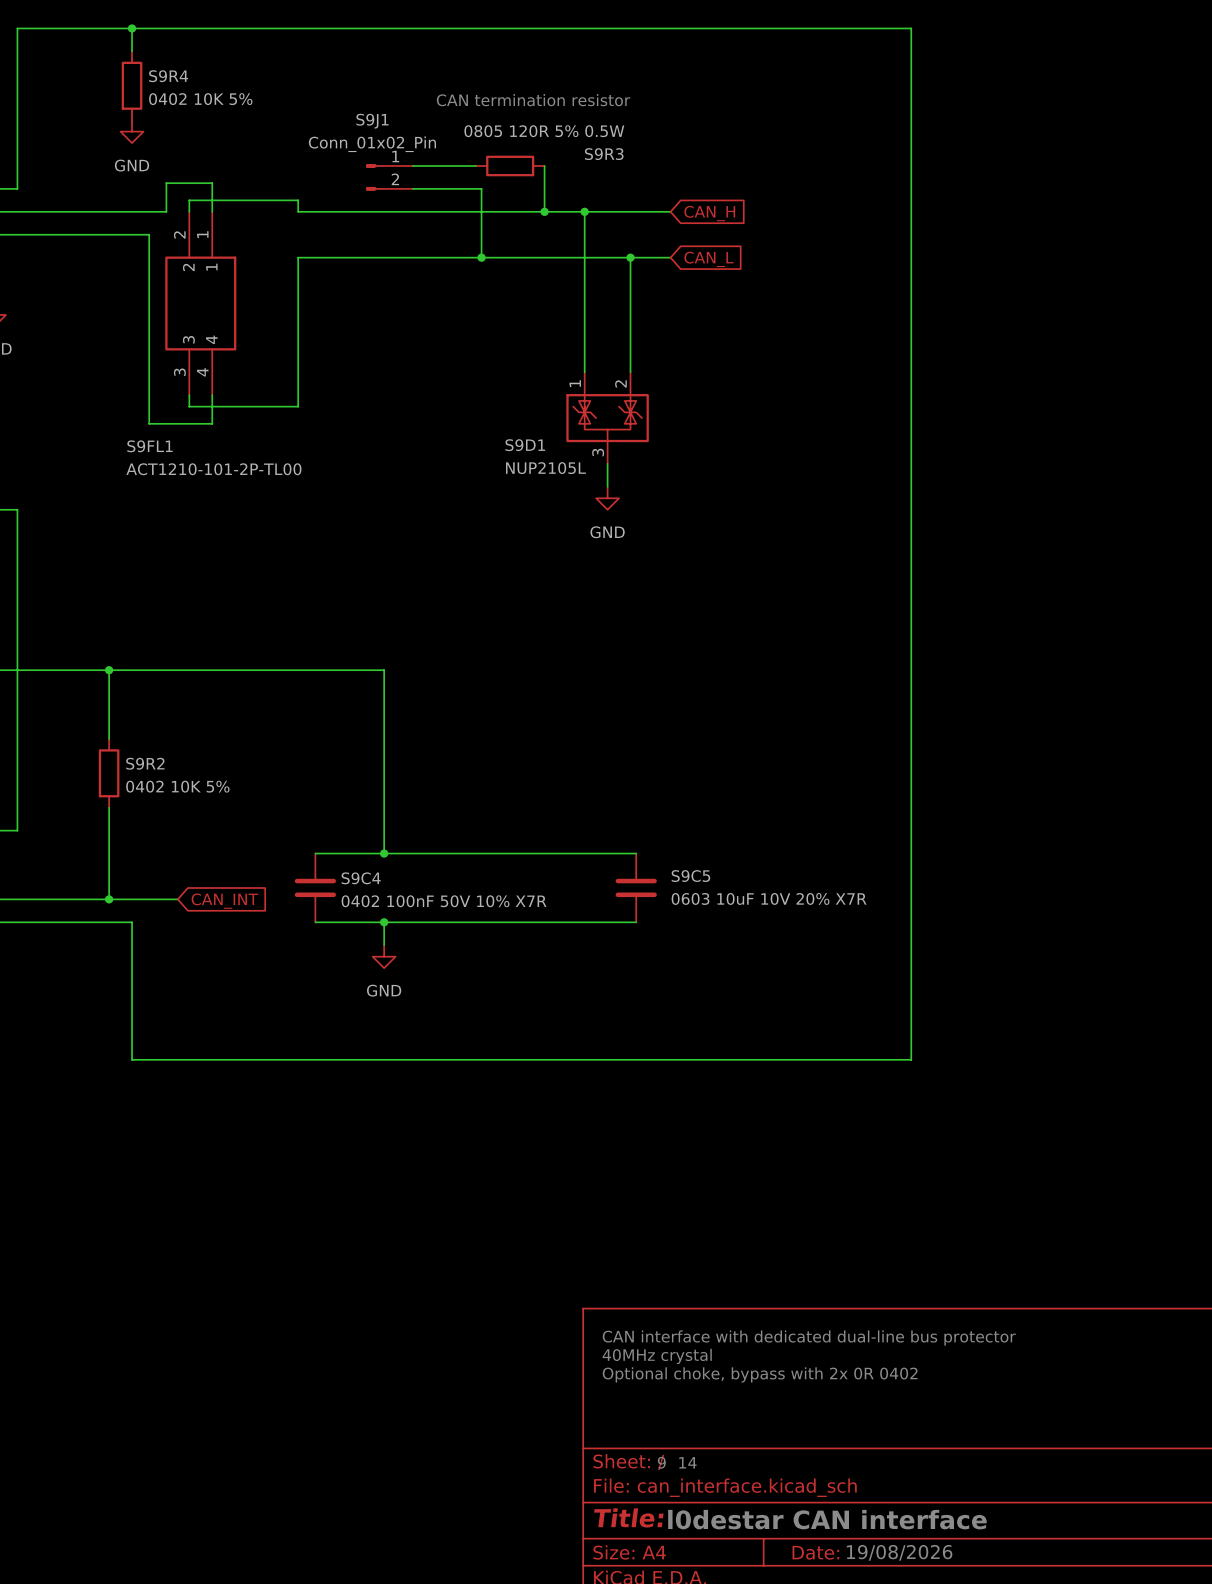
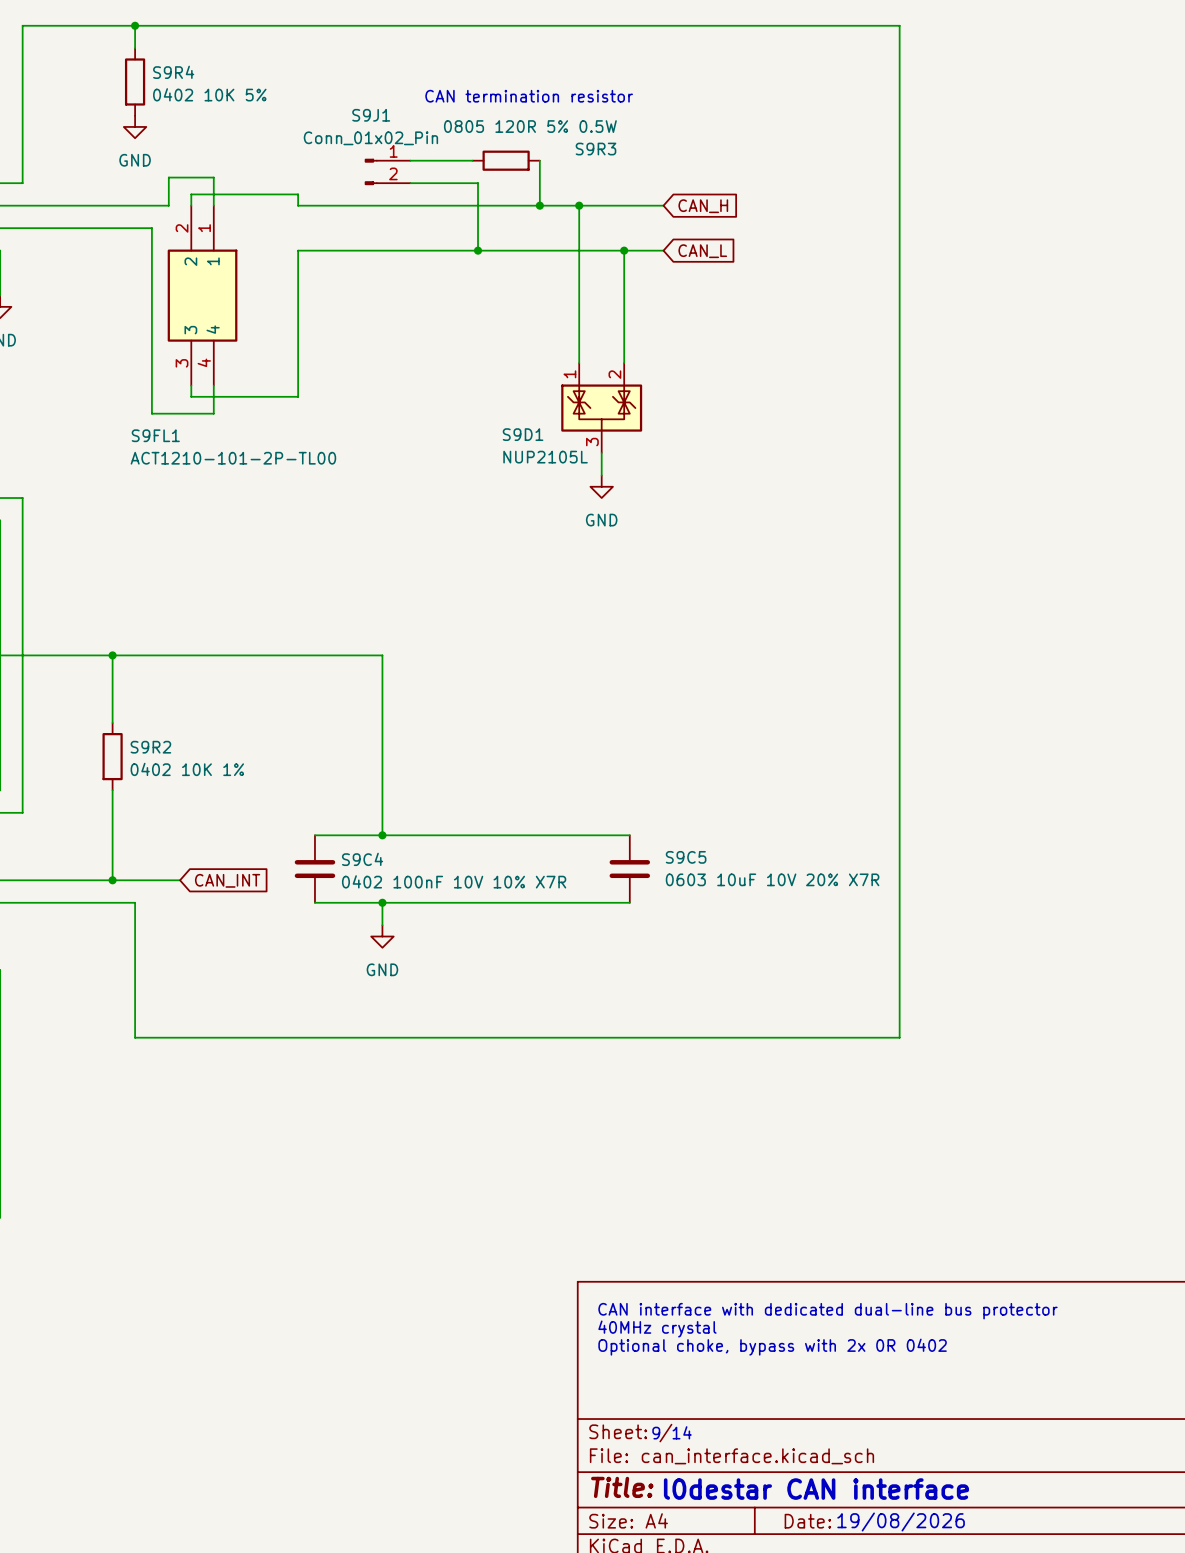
S9R2 value: 0402 10K 5% (177, 786) -> 0402 10K 1% (187, 769)
S9C4 value: 0402 100nF 50V 10% X7R (444, 901) -> 0402 100nF 10V 10% X7R (454, 881)

